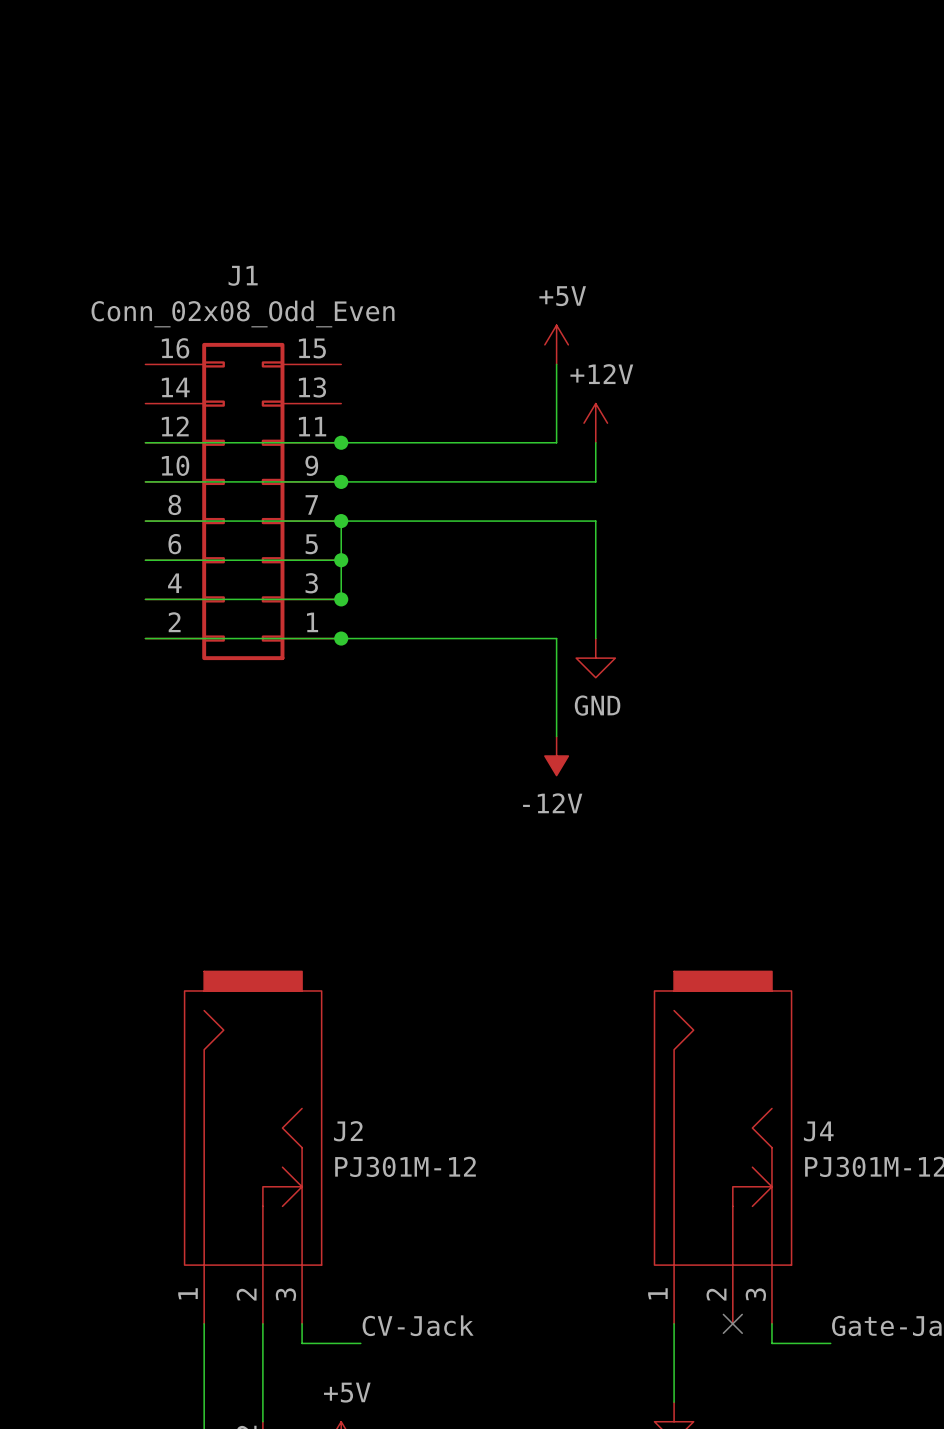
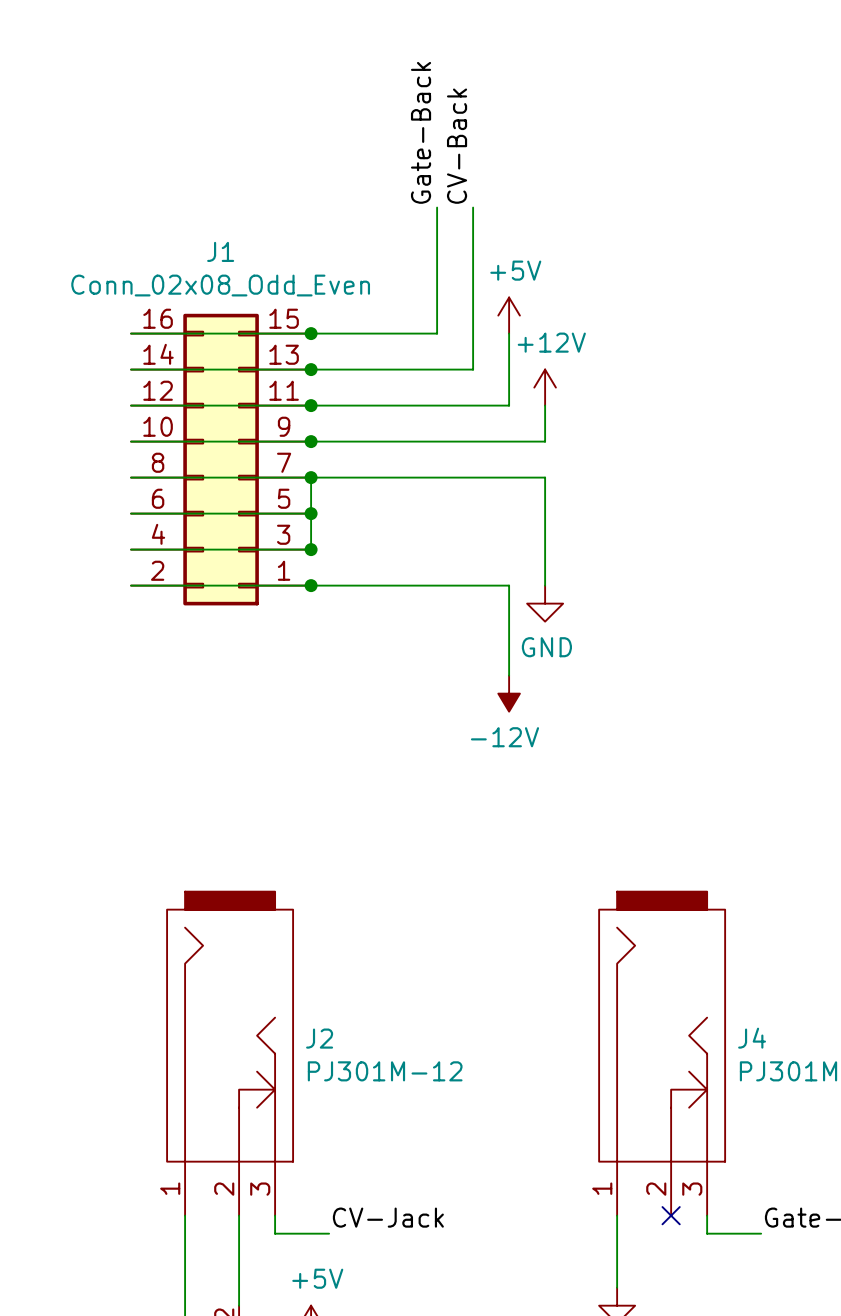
label: none -> Gate-Back (421, 132)
label: none -> CV-Back (457, 146)
wire: none -> (437, 207) (437, 333) (131, 333)
wire: none -> (473, 207) (473, 369) (131, 369)
junction: none -> (311, 333)
junction: none -> (311, 369)

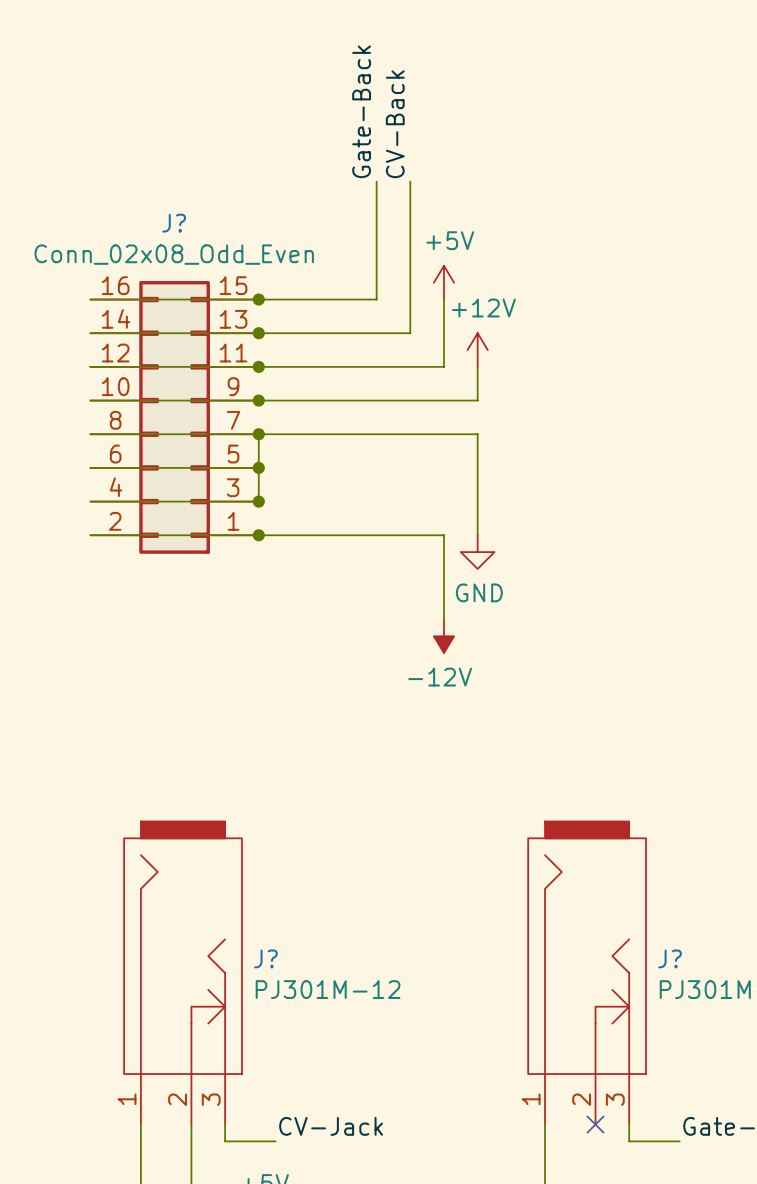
J1 name: J1 (220, 251) -> J? (174, 223)
J2 name: J2 (319, 1038) -> J? (265, 958)
J4 name: J4 (752, 1038) -> J? (670, 958)

